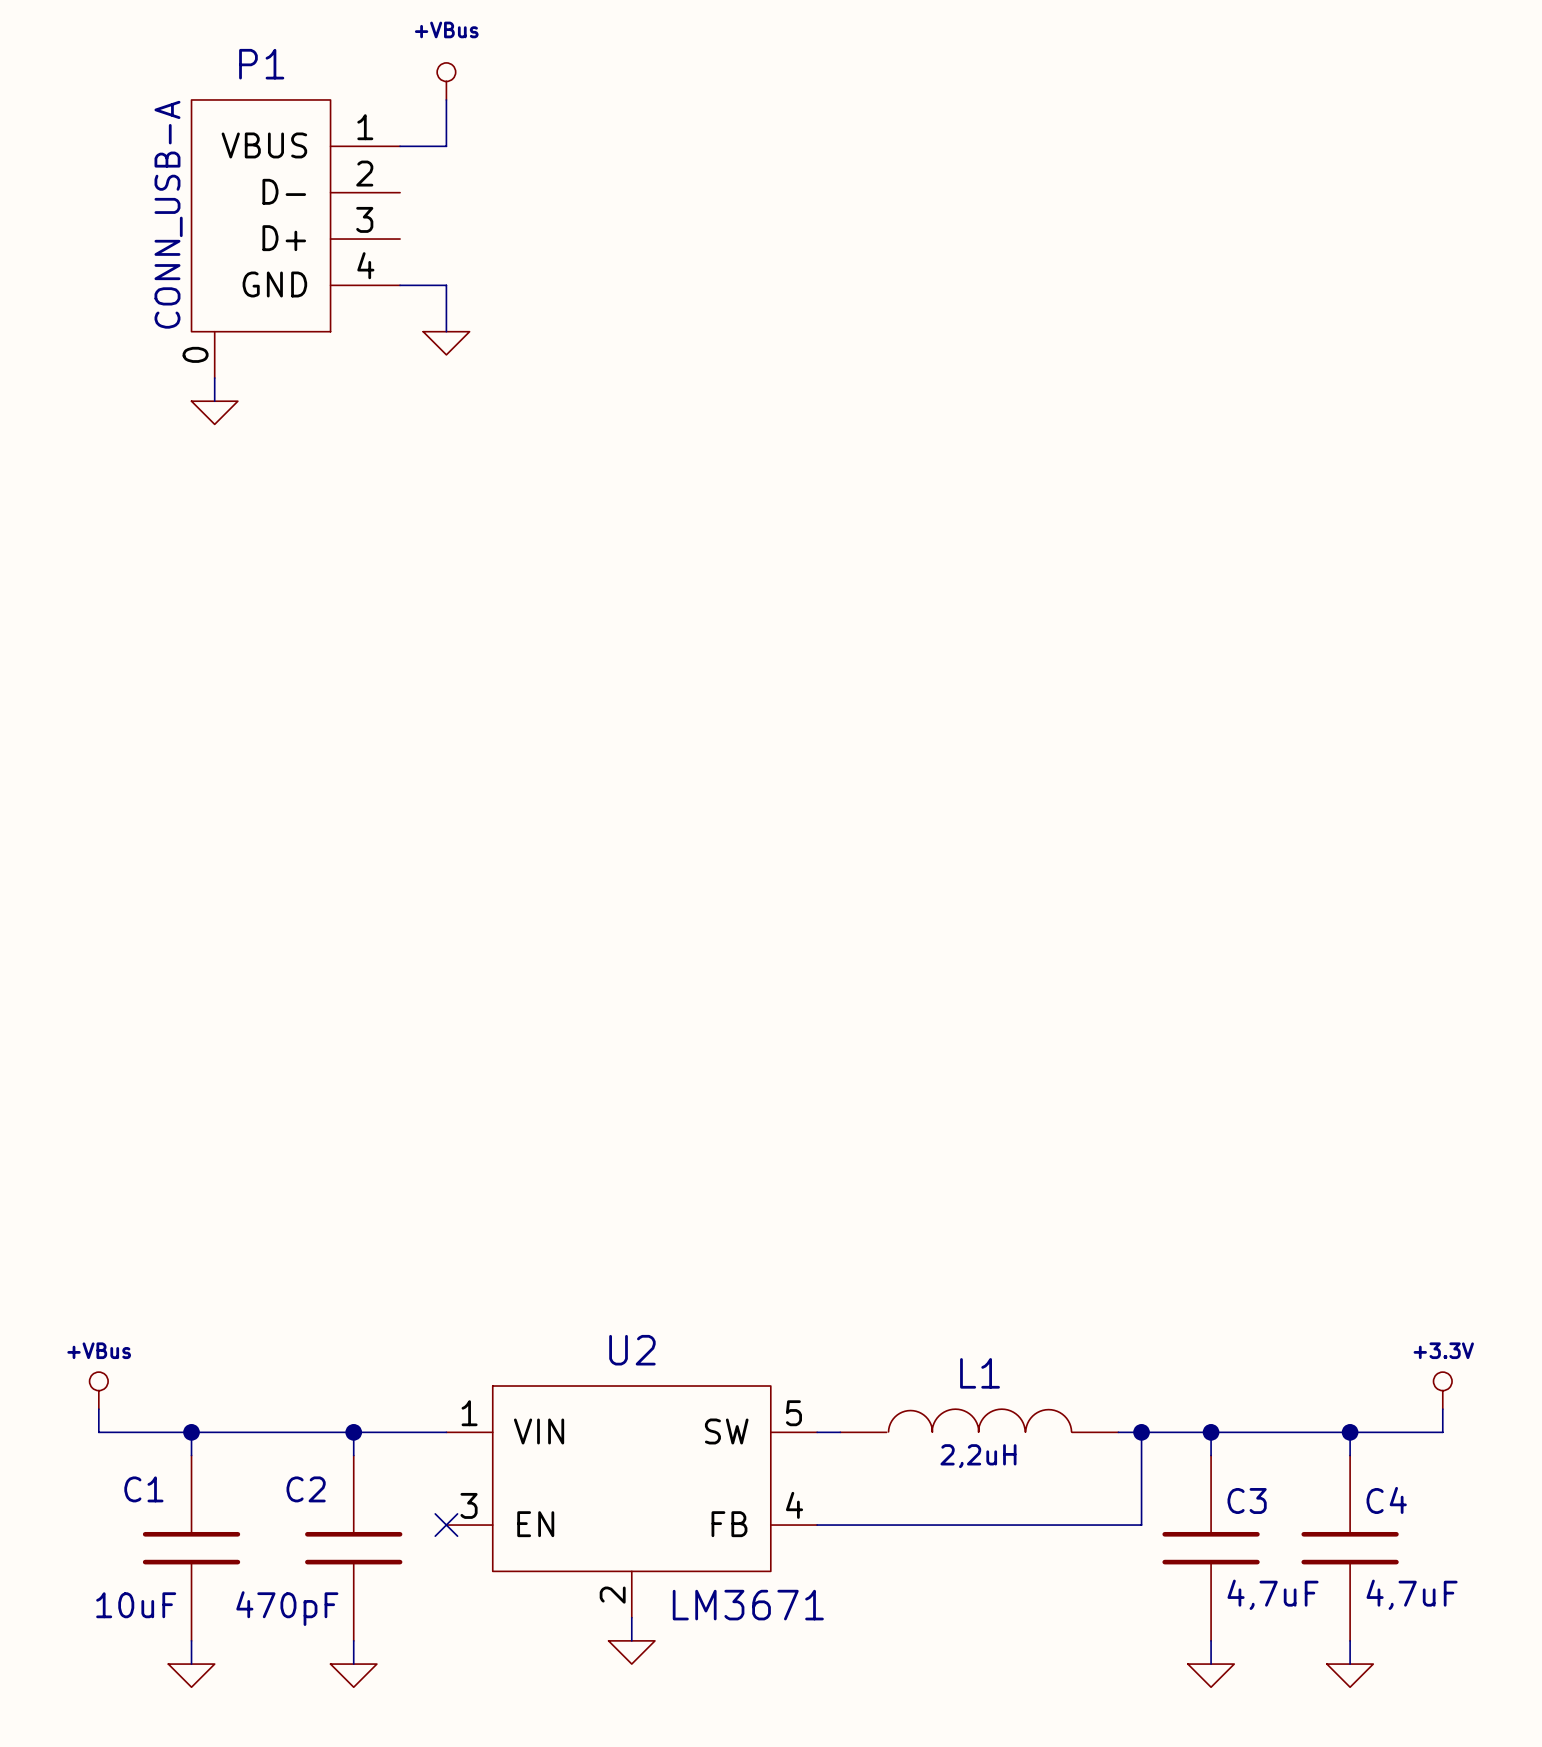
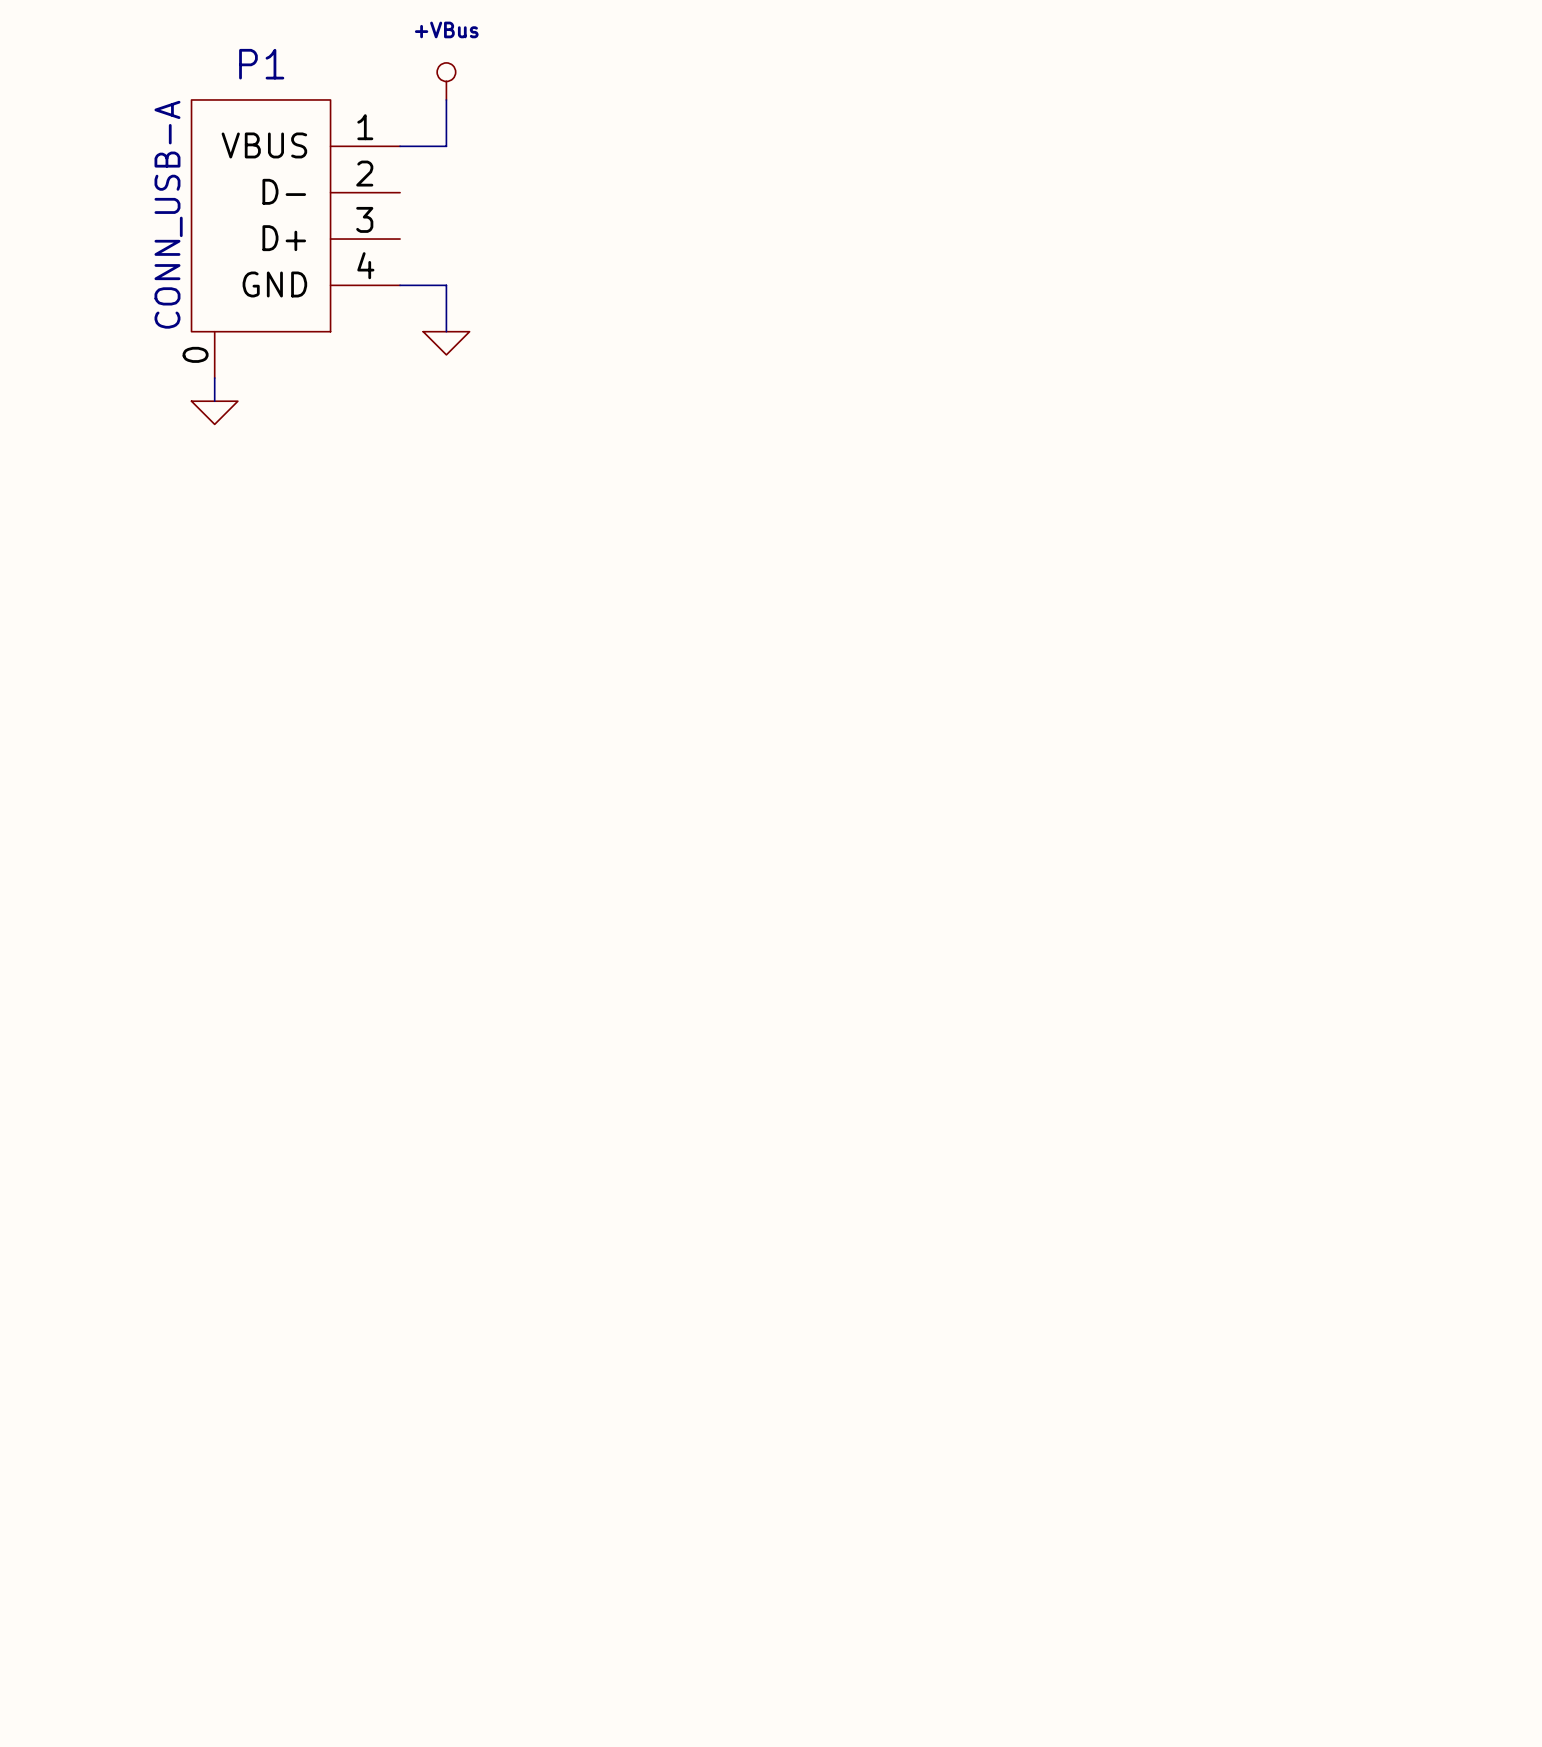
power symbol: +VBus (98, 1390) -> none
power symbol: +3.3V (1442, 1390) -> none
wire: (98, 1409) (98, 1432) (446, 1432) -> none
wire: (1442, 1409) (1442, 1432) (1118, 1432) -> none
L1: 2,2uH (979, 1420) -> none
wire: (191, 1432) (191, 1455) -> none
junction: (191, 1432) -> none
wire: (353, 1432) (353, 1455) -> none
junction: (353, 1432) -> none
wire: (817, 1432) (840, 1432) -> none
wire: (1141, 1432) (1141, 1525) (817, 1525) -> none
junction: (1141, 1432) -> none
wire: (1211, 1432) (1211, 1455) -> none
junction: (1211, 1432) -> none
wire: (1350, 1432) (1350, 1455) -> none
junction: (1350, 1432) -> none
U2: LM3671 (631, 1501) -> none
no-connect mark: (446, 1525) -> none
C1: 10uF (191, 1548) -> none
C2: 470pF (353, 1548) -> none
C3: 4,7uF (1211, 1548) -> none
C4: 4,7uF (1350, 1548) -> none
wire: (631, 1617) (631, 1640) -> none
wire: (191, 1640) (191, 1664) -> none
wire: (353, 1640) (353, 1664) -> none
wire: (1211, 1640) (1211, 1664) -> none
wire: (1350, 1640) (1350, 1664) -> none
power symbol: (631, 1652) -> none
power symbol: (191, 1675) -> none
power symbol: (353, 1675) -> none
power symbol: (1211, 1675) -> none
power symbol: (1350, 1675) -> none

